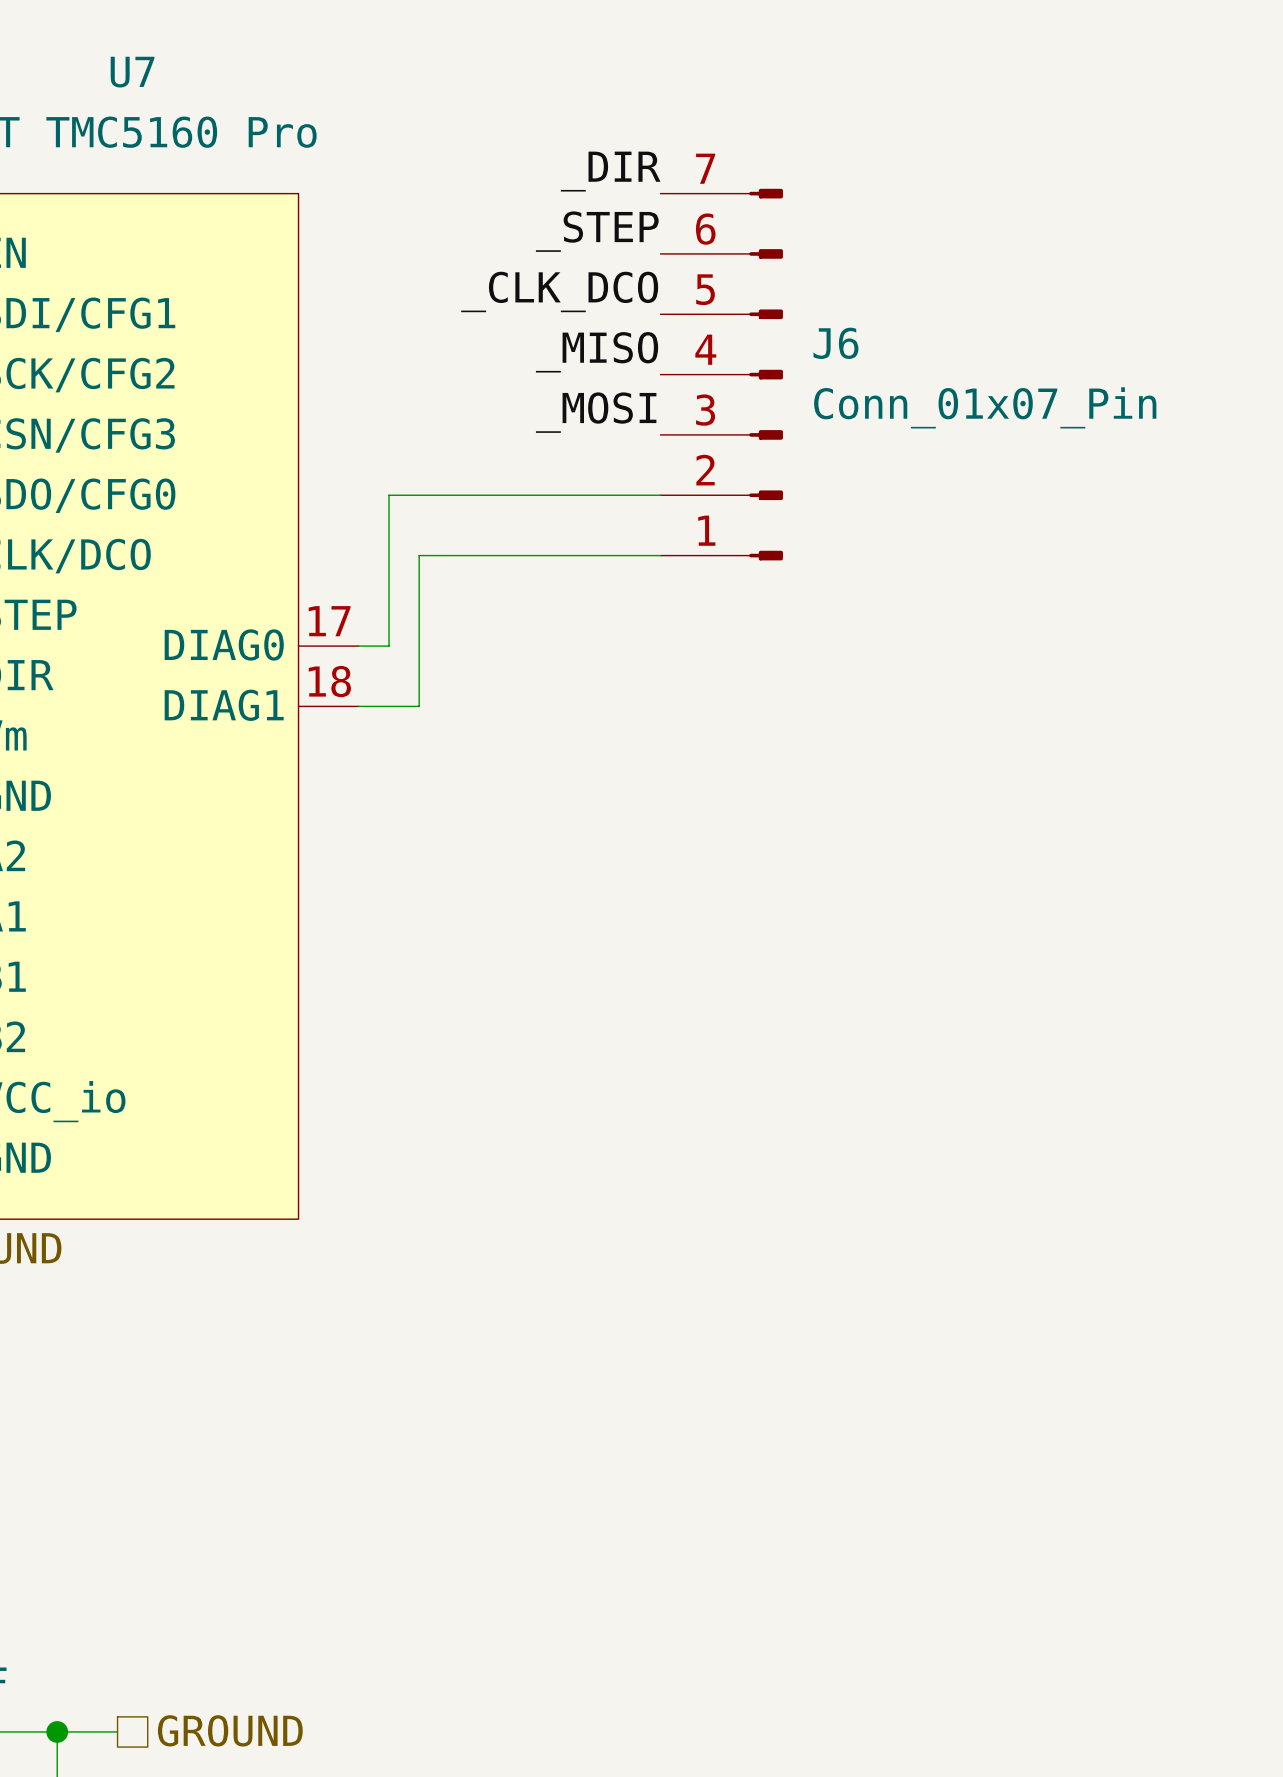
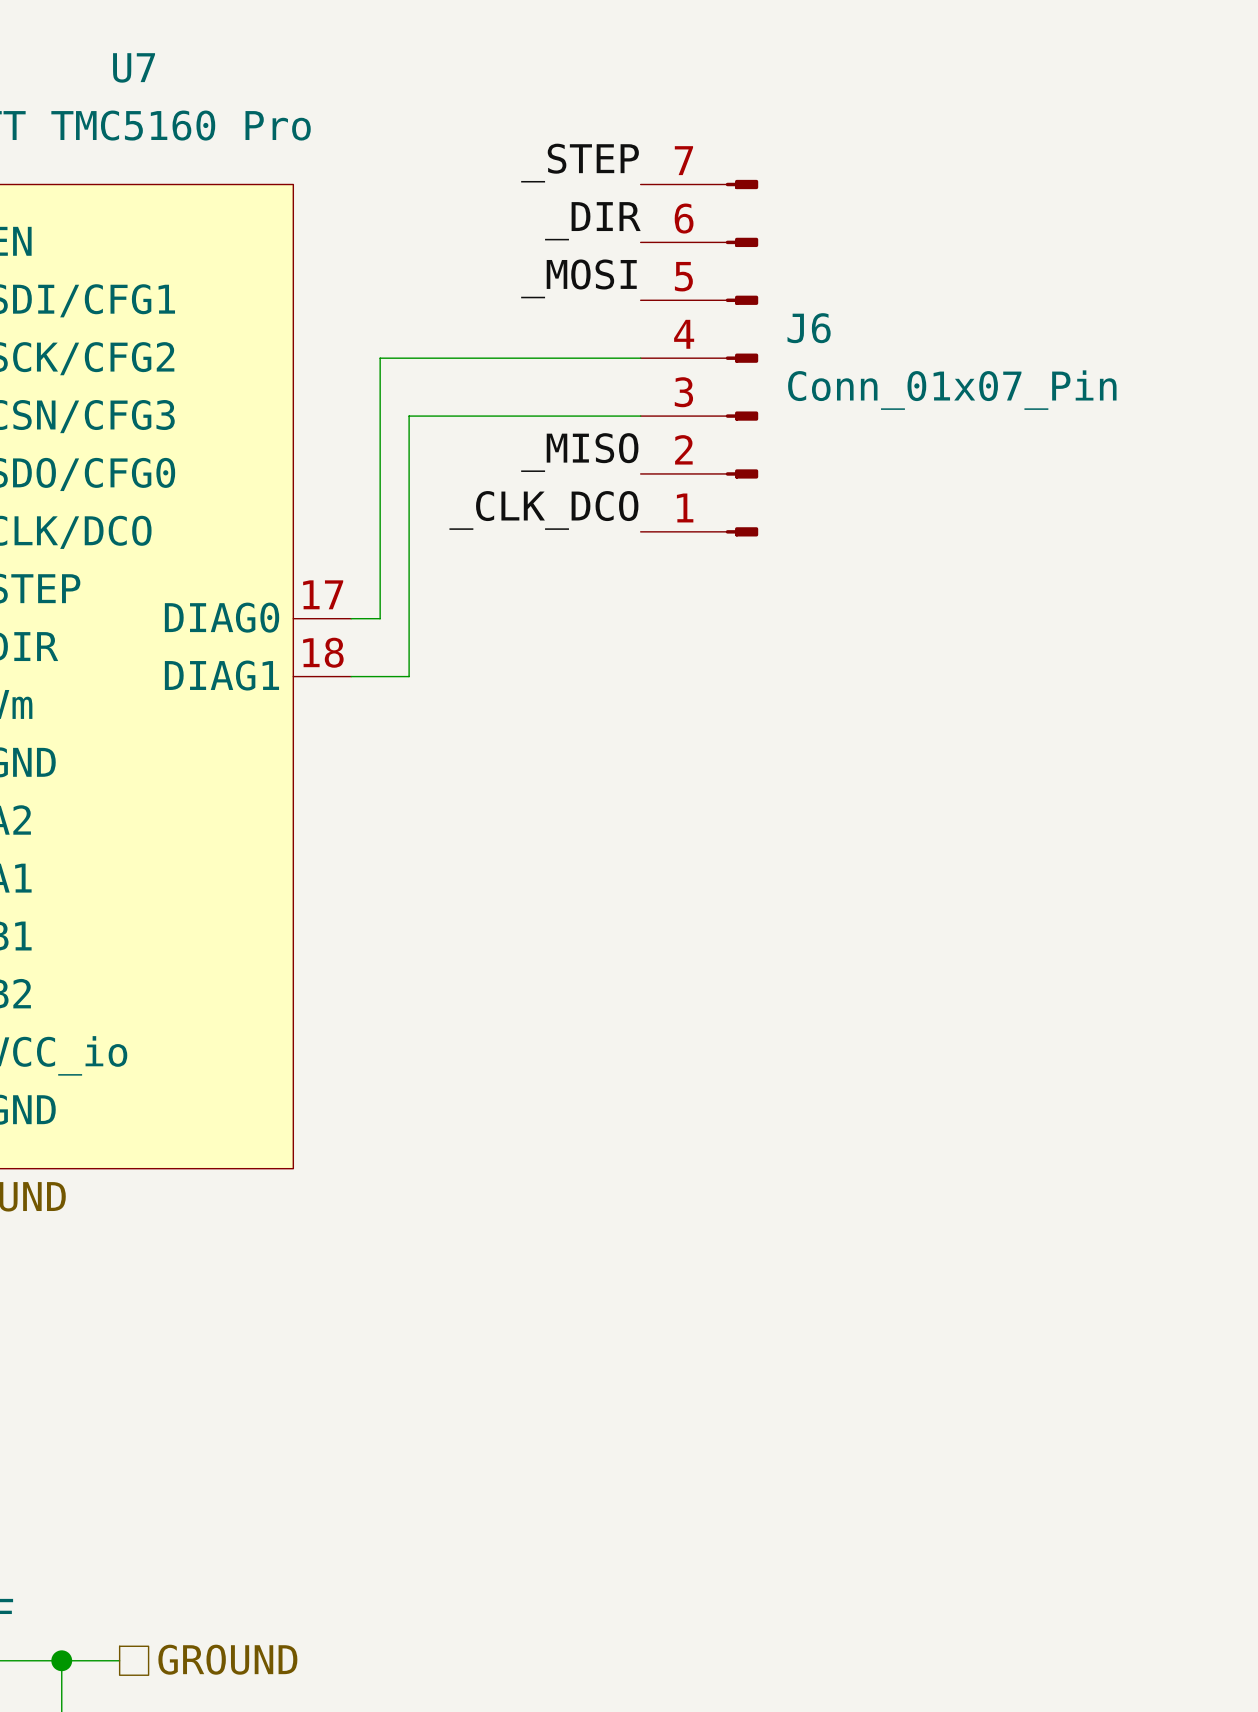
label: _DIR (610, 171) -> _STEP (580, 163)
label: _STEP (597, 231) -> _DIR (592, 221)
label: _CLK_DCO (559, 291) -> _MOSI (578, 278)
label position: _MISO (597, 352) -> _MISO (579, 452)
label: _MOSI (596, 412) -> none
wire: (389, 495) (660, 495) -> (380, 473) (380, 358) (640, 358)
label: none -> _CLK_DCO (543, 510)
wire: (419, 555) (660, 555) -> (409, 531) (409, 416) (640, 416)

